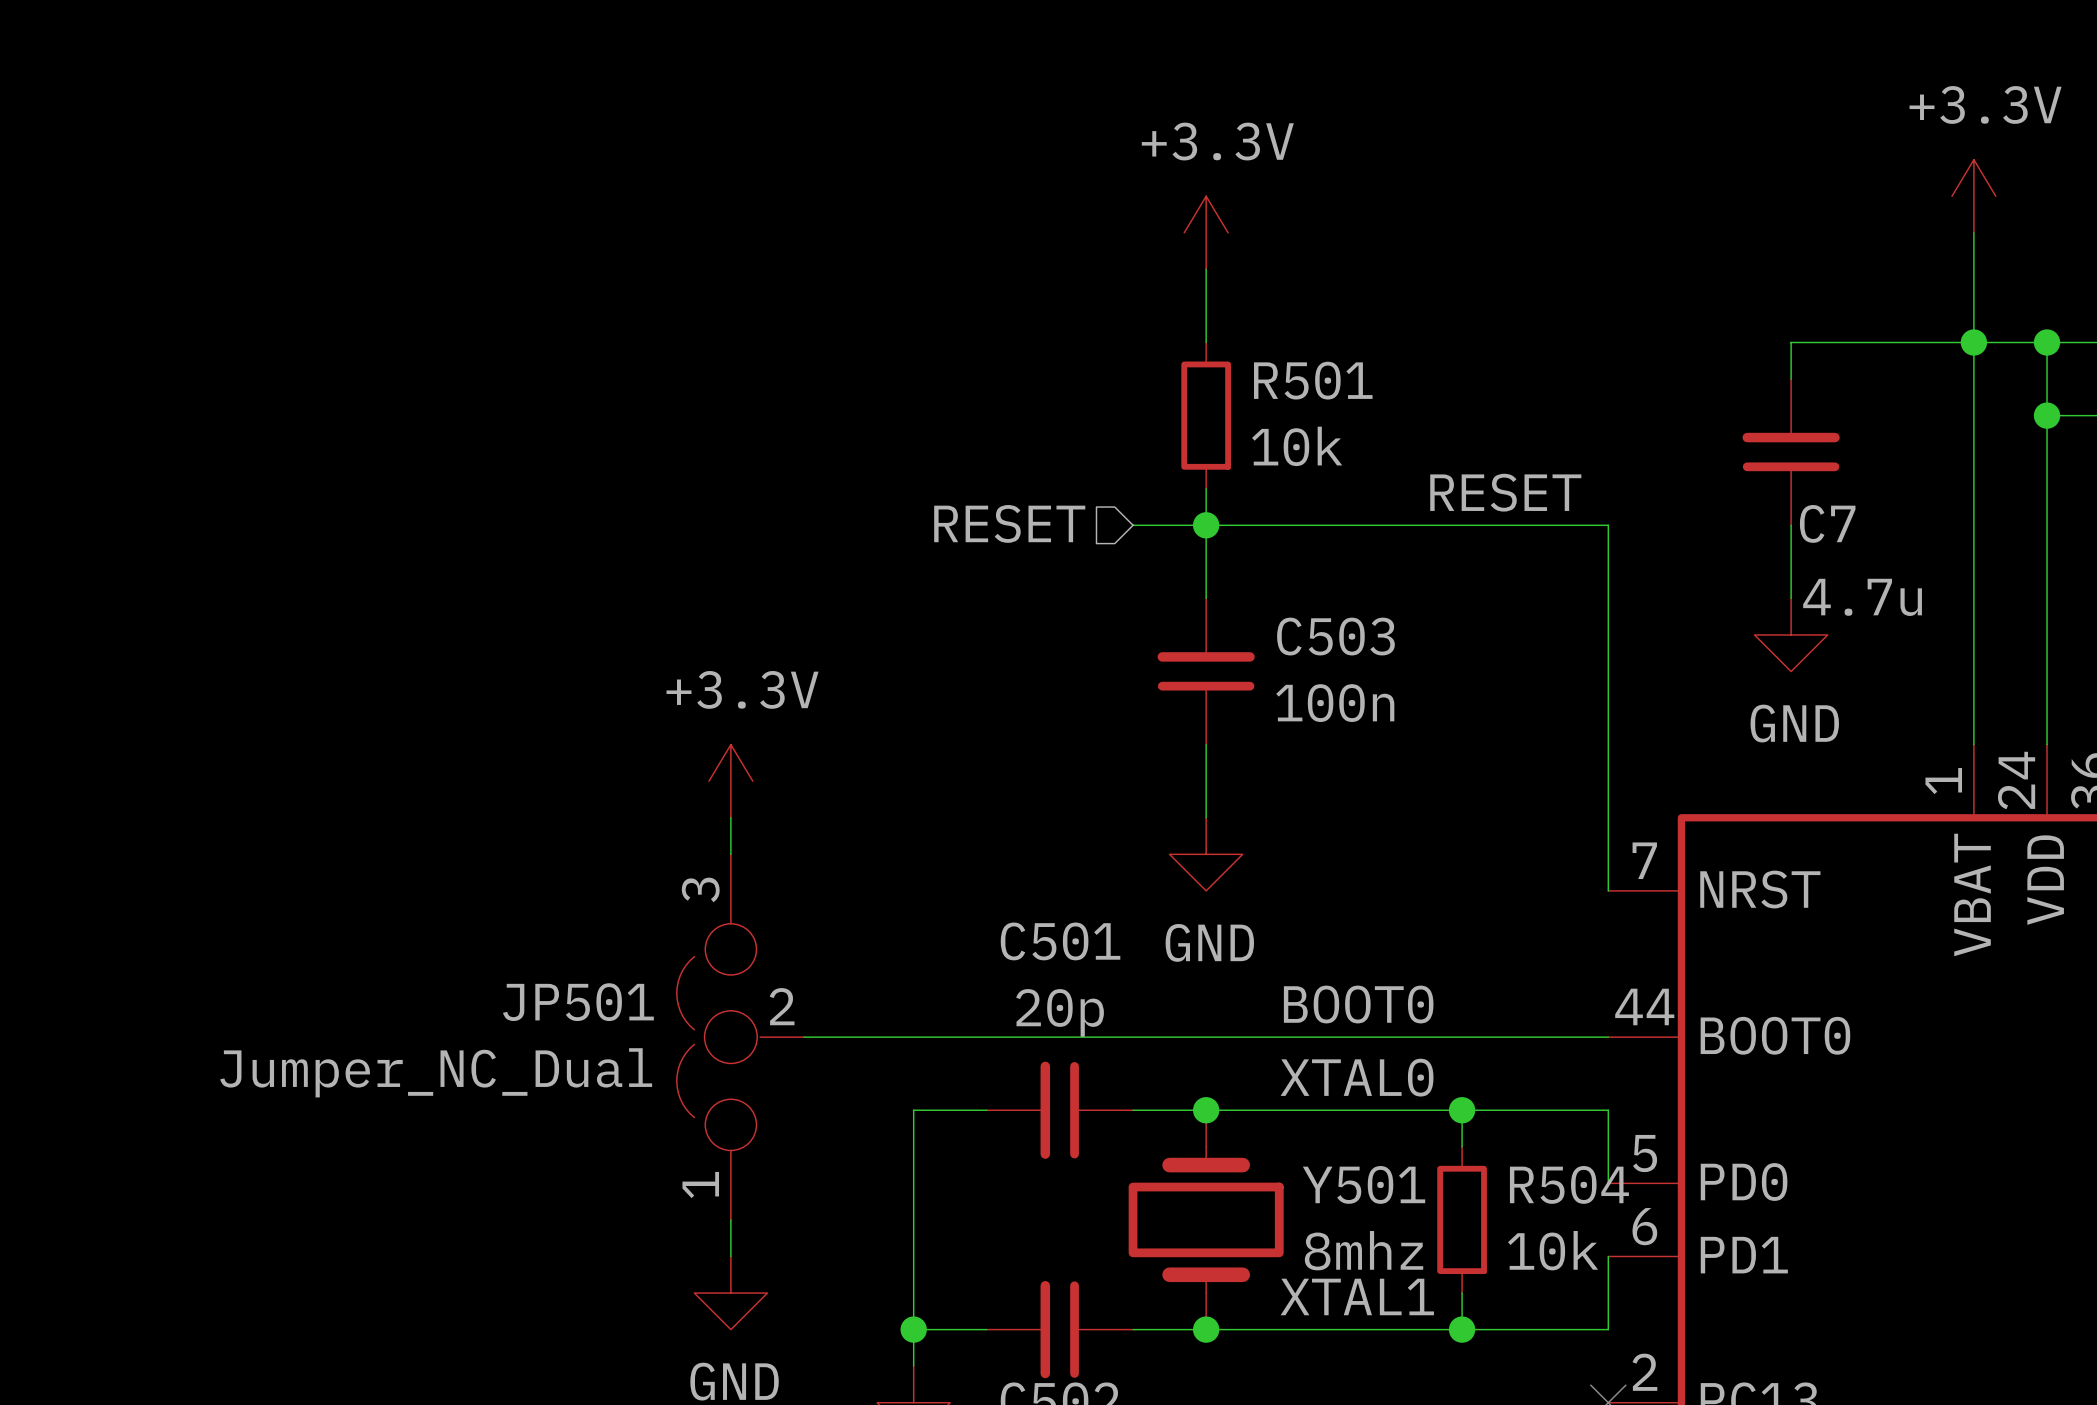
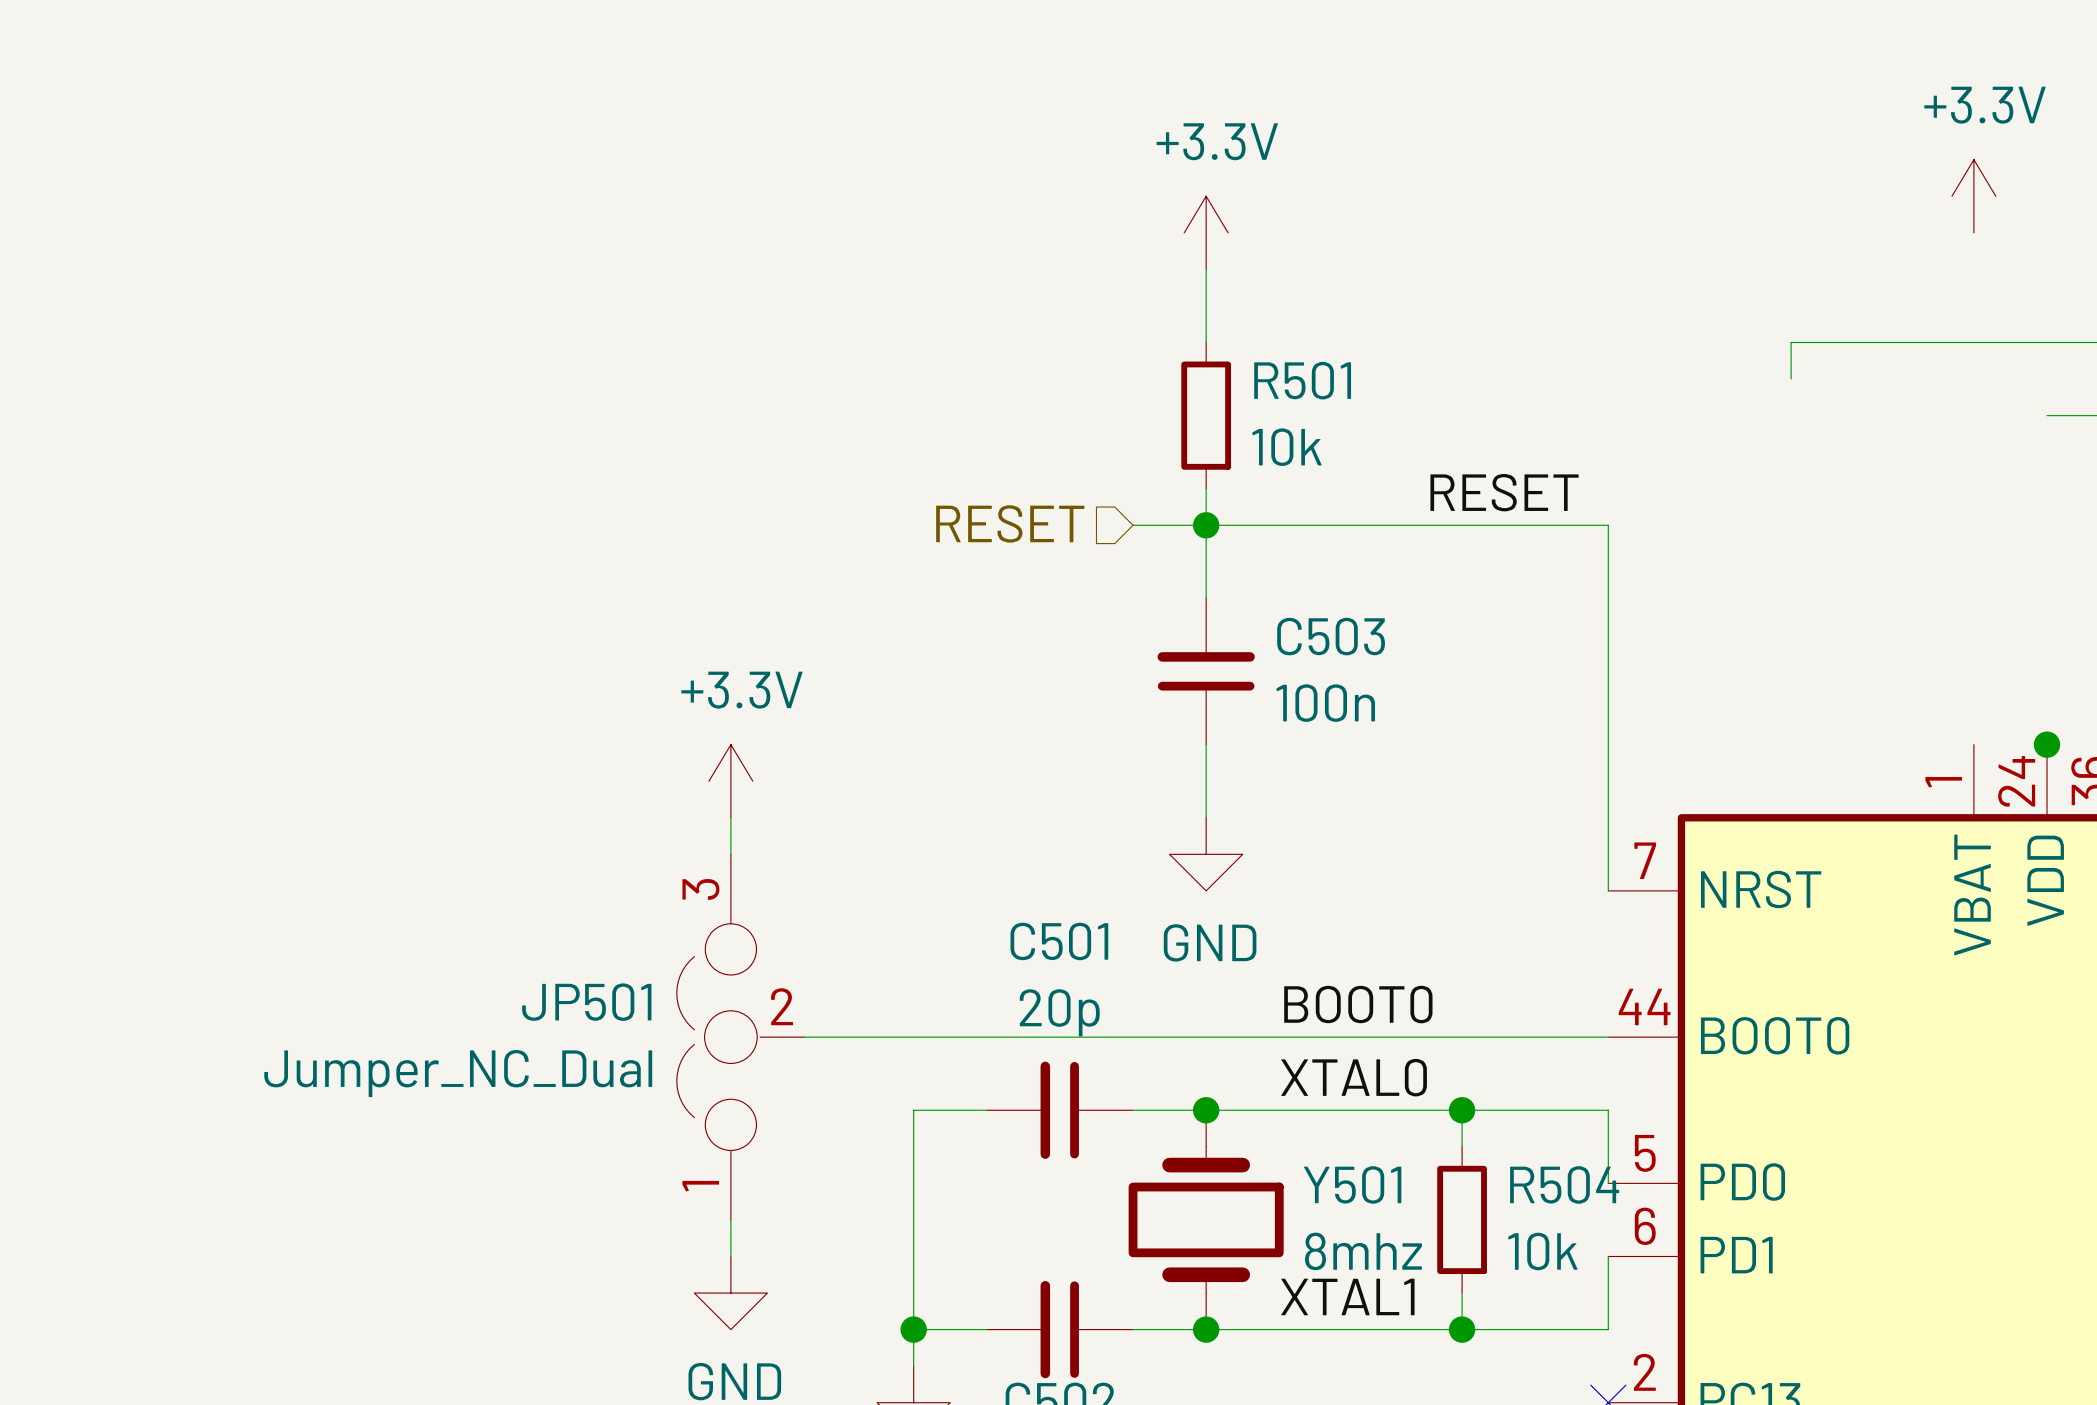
wire: (1973, 232) (1973, 744) -> none
junction: (1973, 342) -> none
wire: (2047, 342) (2047, 744) -> none
junction: (2047, 342) -> none
junction: (2047, 415) -> none
C7: 4.7u (1791, 452) -> none
wire: (1791, 525) (1791, 598) -> none
power symbol: GND (1791, 634) -> none
junction: none -> (2047, 744)

